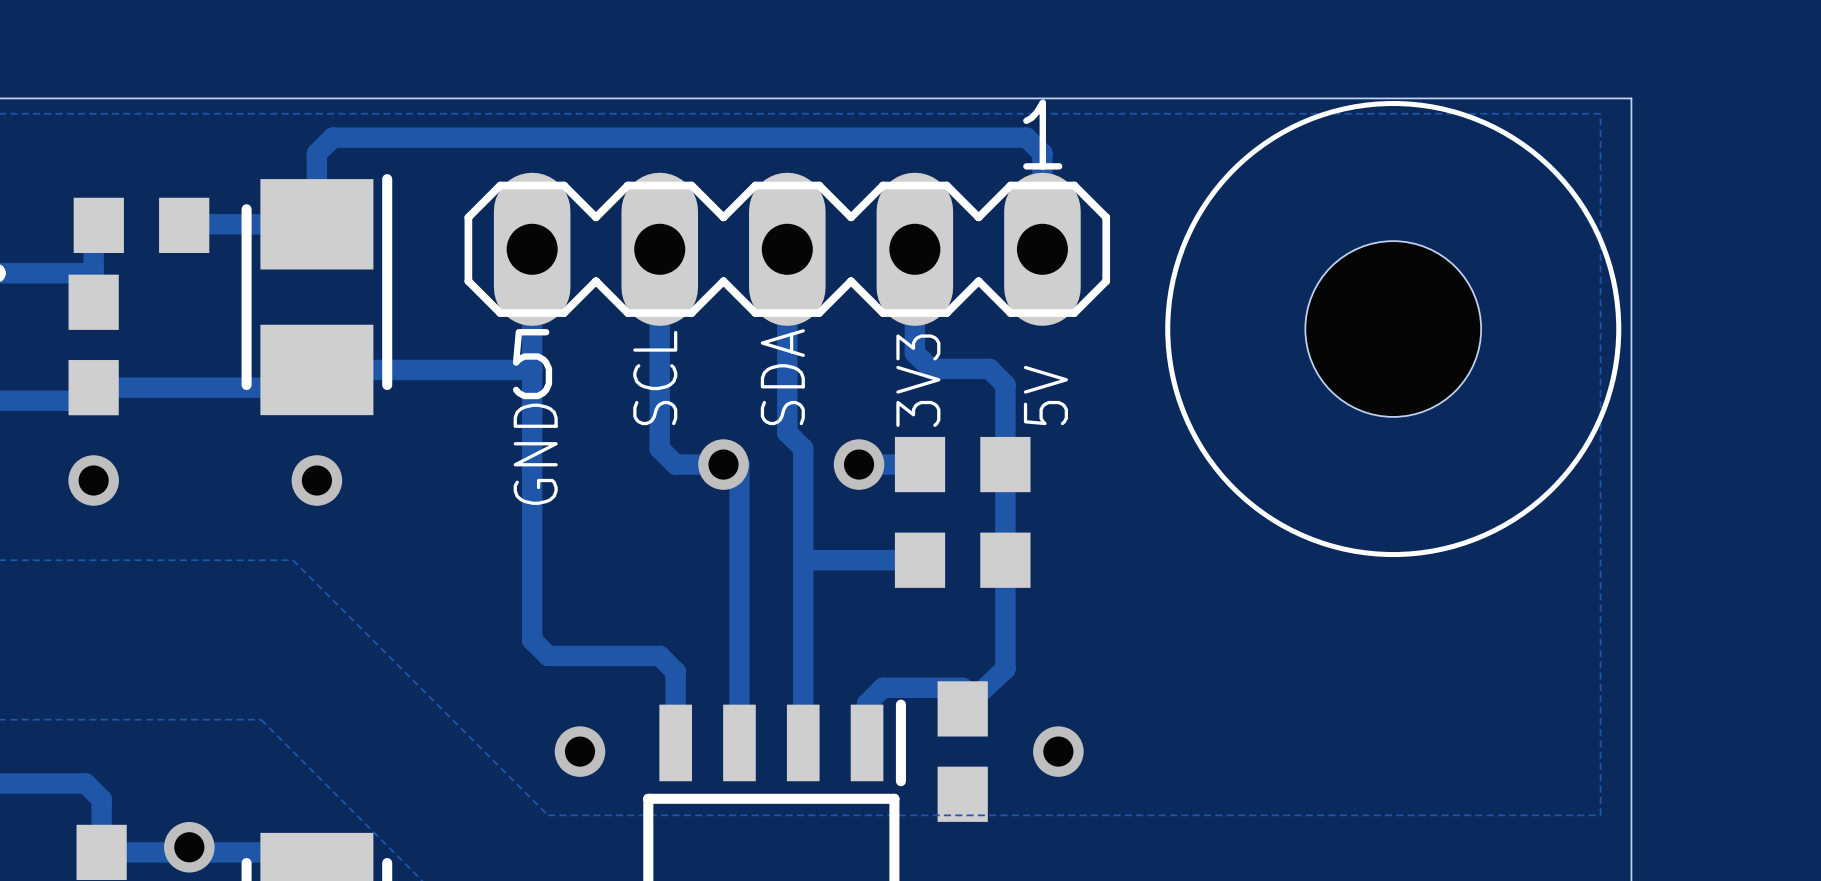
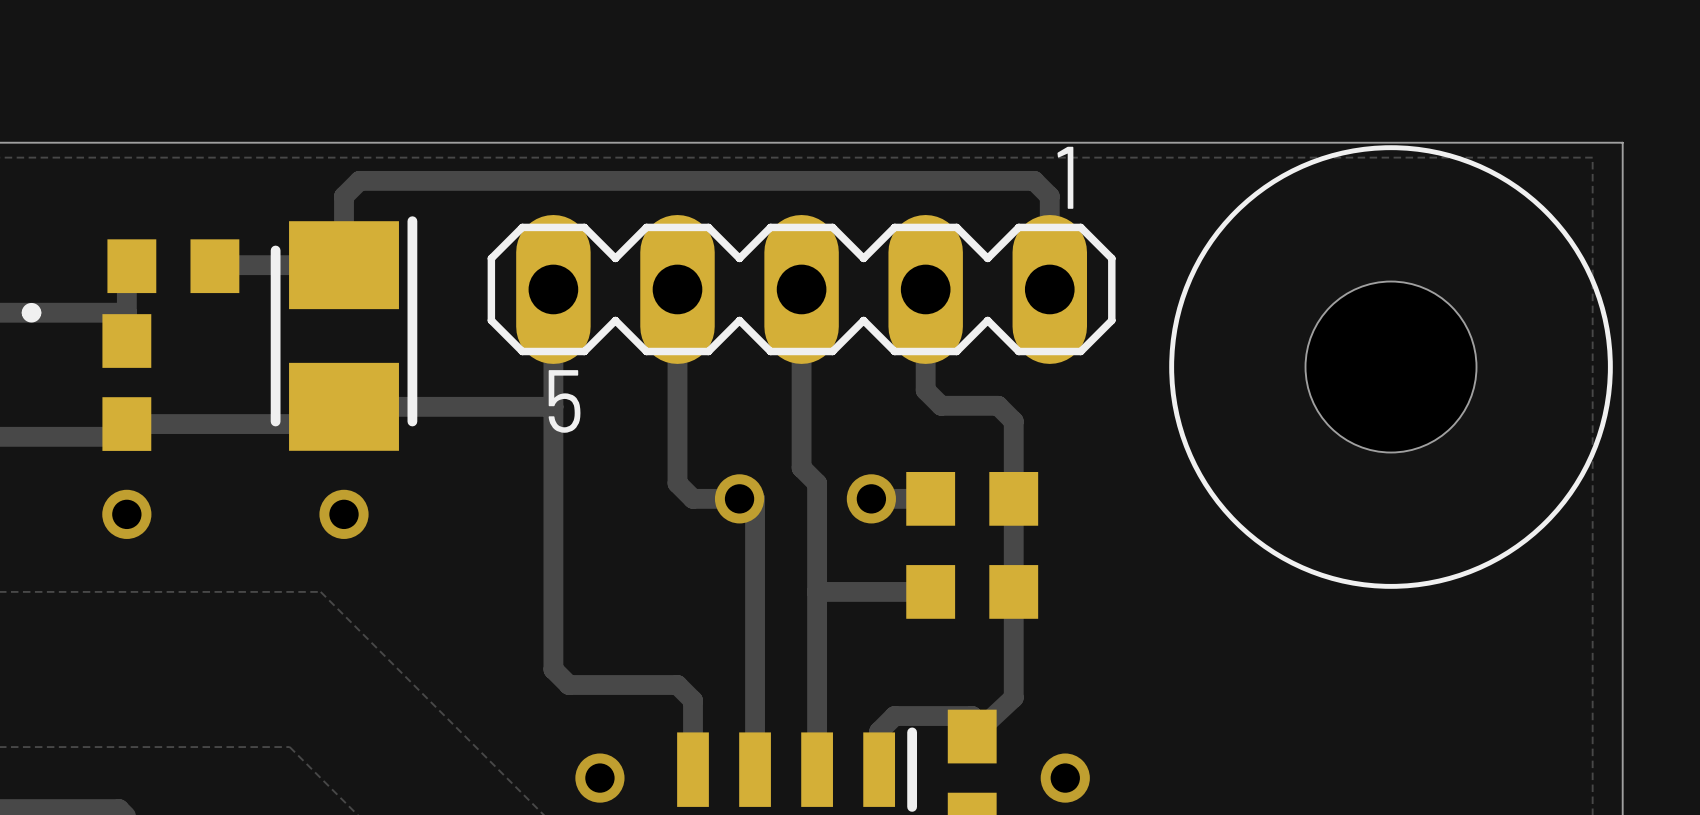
text: SDA (782, 377) -> none
text: SCL (655, 378) -> none
text: 3V3 (918, 380) -> none
text: 5V (1045, 395) -> none
text: GND (535, 454) -> none

